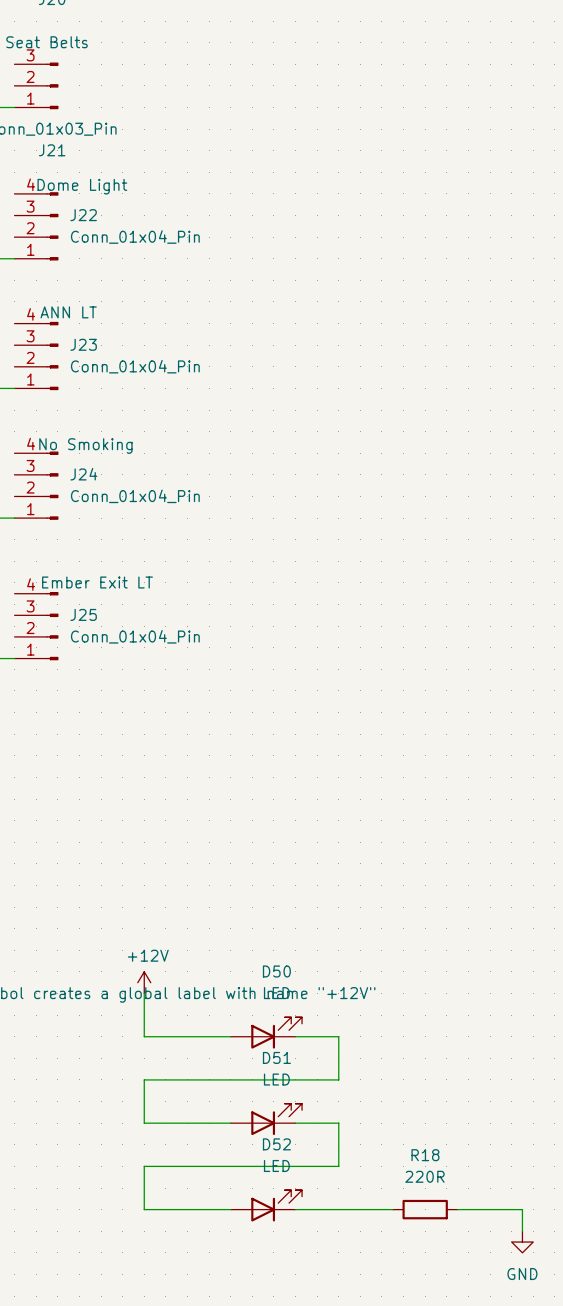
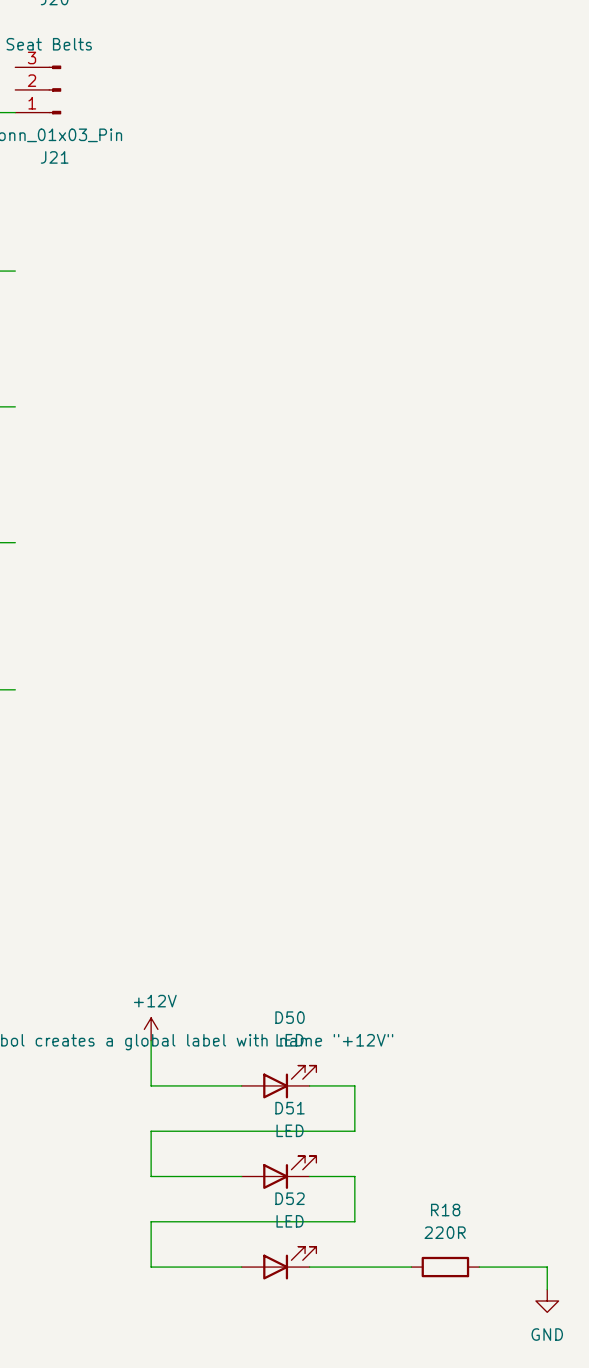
J22: Conn_01x04_Pin (36, 226) -> none
J23: Conn_01x04_Pin (36, 356) -> none
J24: Conn_01x04_Pin (36, 485) -> none
J25: Conn_01x04_Pin (36, 626) -> none

